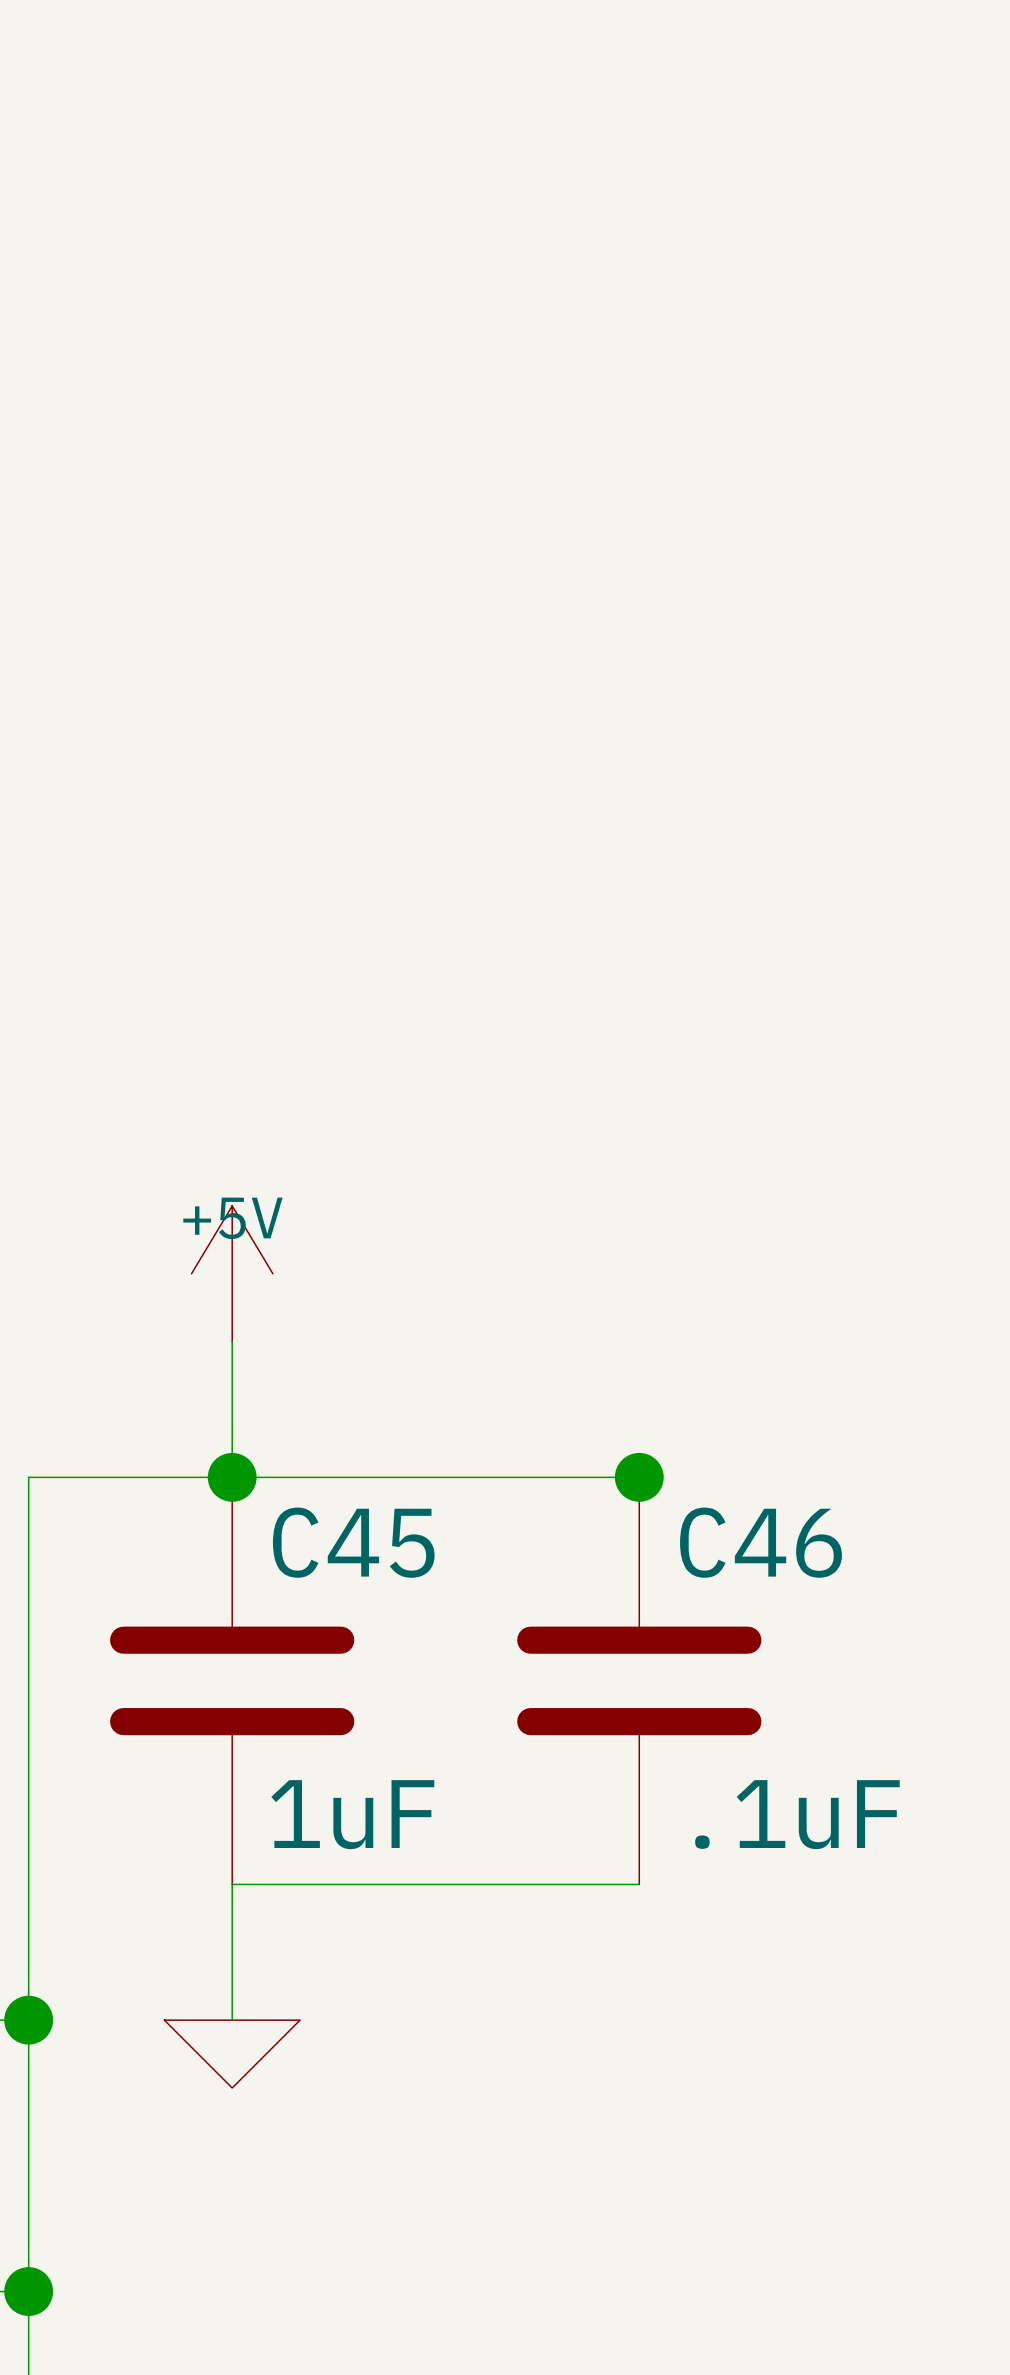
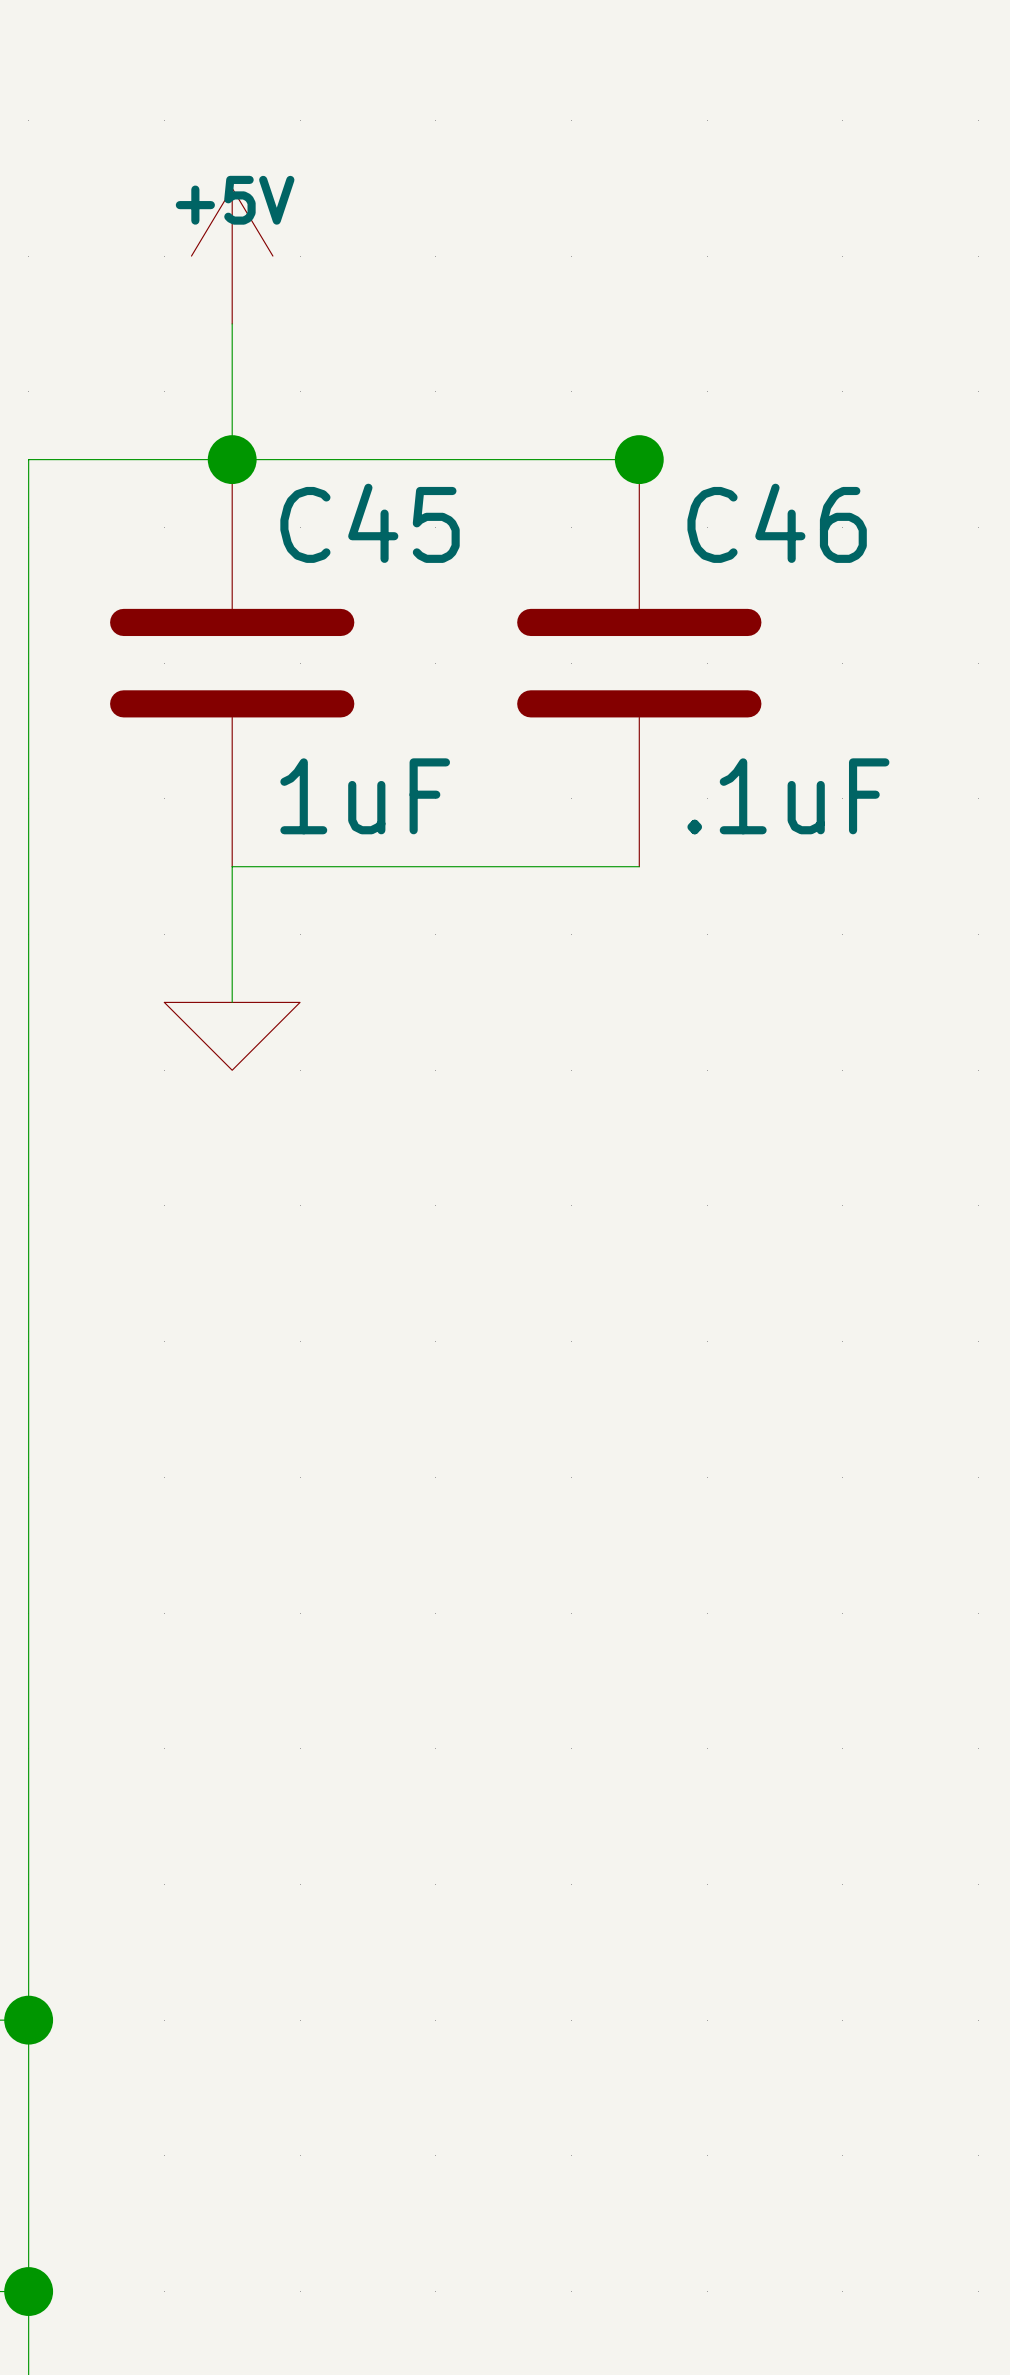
junction: none -> (232, 459)
junction: none -> (639, 459)
power symbol position: +5V (232, 1273) -> +5V (232, 256)
wire: (232, 1341) (232, 1477) -> (232, 323) (232, 459)
wire: (28, 1477) (639, 1477) -> (28, 1477) (28, 459) (639, 459)
junction: (232, 1477) -> none
junction: (639, 1477) -> none
C45 position: (232, 1680) -> (232, 663)
C46 position: (639, 1680) -> (639, 663)
wire: (639, 1884) (232, 1884) (232, 2020) -> (639, 866) (232, 866) (232, 1002)
power symbol position: (232, 2054) -> (232, 1036)

